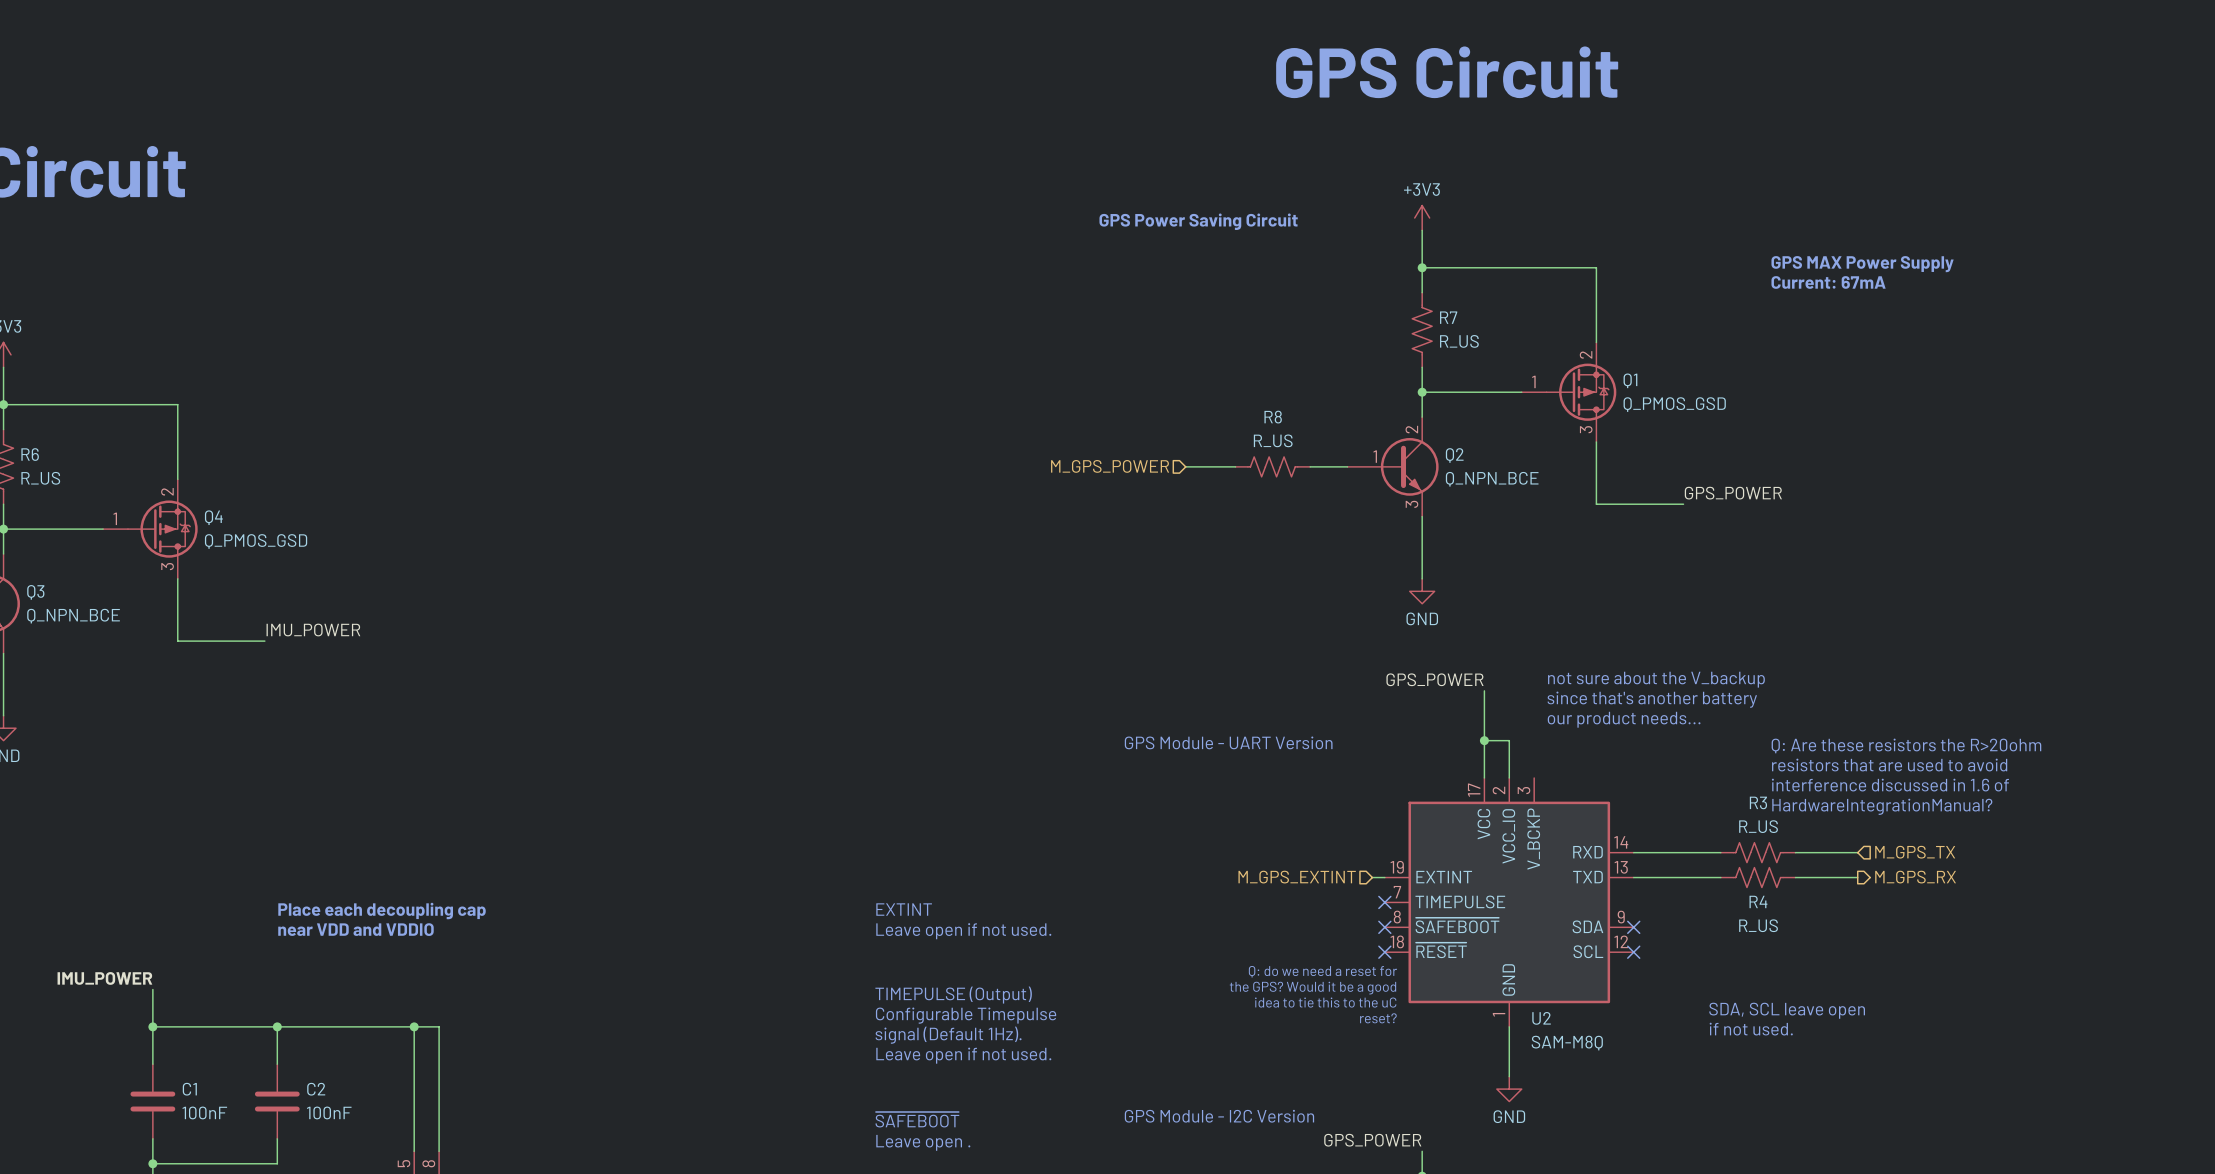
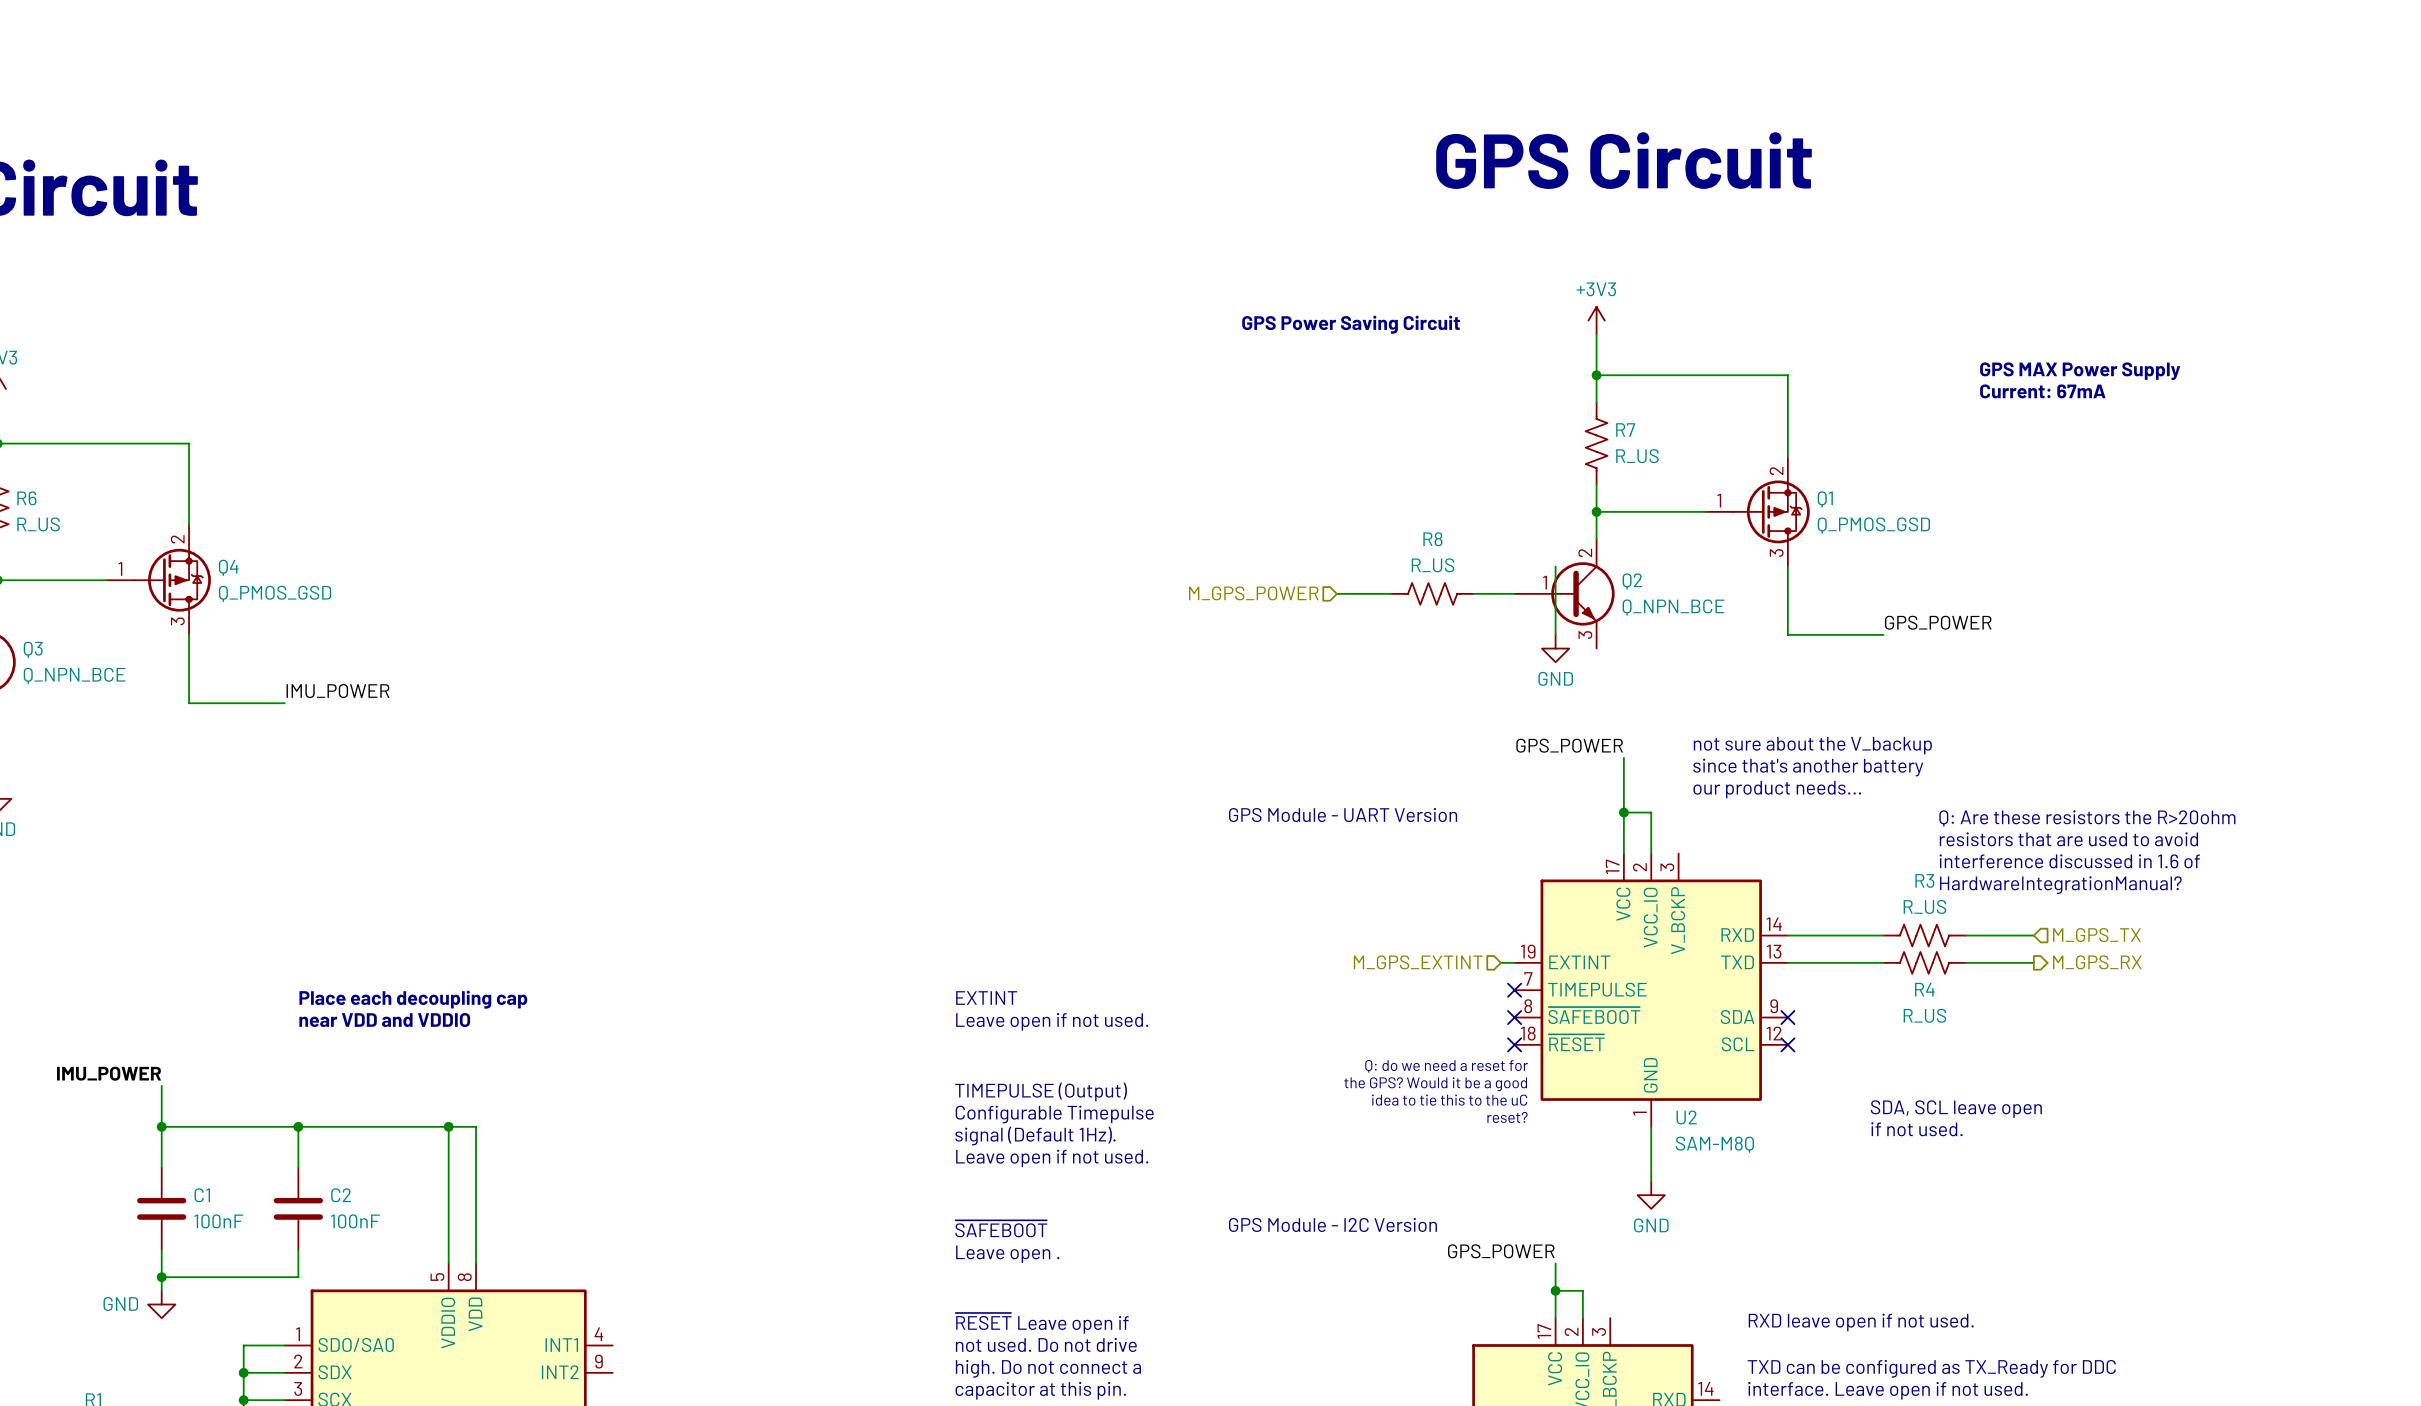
text position: GPS Circuit (1447, 72) -> GPS Circuit (1624, 160)
power symbol position: +3V3 (1422, 218) -> +3V3 (1596, 320)
text position: GPS Power Saving Circuit (1198, 221) -> GPS Power Saving Circuit (1351, 324)
wire: (1422, 230) (1422, 292) -> (1596, 334) (1596, 402)
text position: GPS MAX Power Supply (1862, 264) -> GPS MAX Power Supply (2080, 371)
wire: (1422, 267) (1596, 267) (1596, 342) -> (1596, 375) (1787, 375) (1787, 457)
junction: (1422, 267) -> none
text position: Current: 67mA (1828, 282) -> Current: 67mA (2042, 391)
R7 position: (1422, 330) -> (1596, 443)
junction: none -> (1596, 375)
wire: (1422, 367) (1422, 417) -> (1596, 484) (1596, 539)
wire: (1422, 392) (1521, 392) -> (1596, 511) (1705, 511)
junction: (1422, 392) -> none
Q1 position: (1569, 392) -> (1757, 511)
wire: (1596, 441) (1596, 504) (1683, 504) -> (1787, 566) (1787, 634) (1883, 634)
hierarchical label position: M_GPS_POWER (1110, 466) -> M_GPS_POWER (1253, 593)
wire: (1185, 466) (1235, 466) -> (1336, 593) (1391, 593)
R8 position: (1272, 466) -> (1432, 593)
wire: (1310, 466) (1347, 466) -> (1473, 593) (1514, 593)
Q2 position: (1393, 466) -> (1564, 593)
junction: none -> (1596, 511)
label position: GPS_POWER (1733, 493) -> GPS_POWER (1938, 622)

